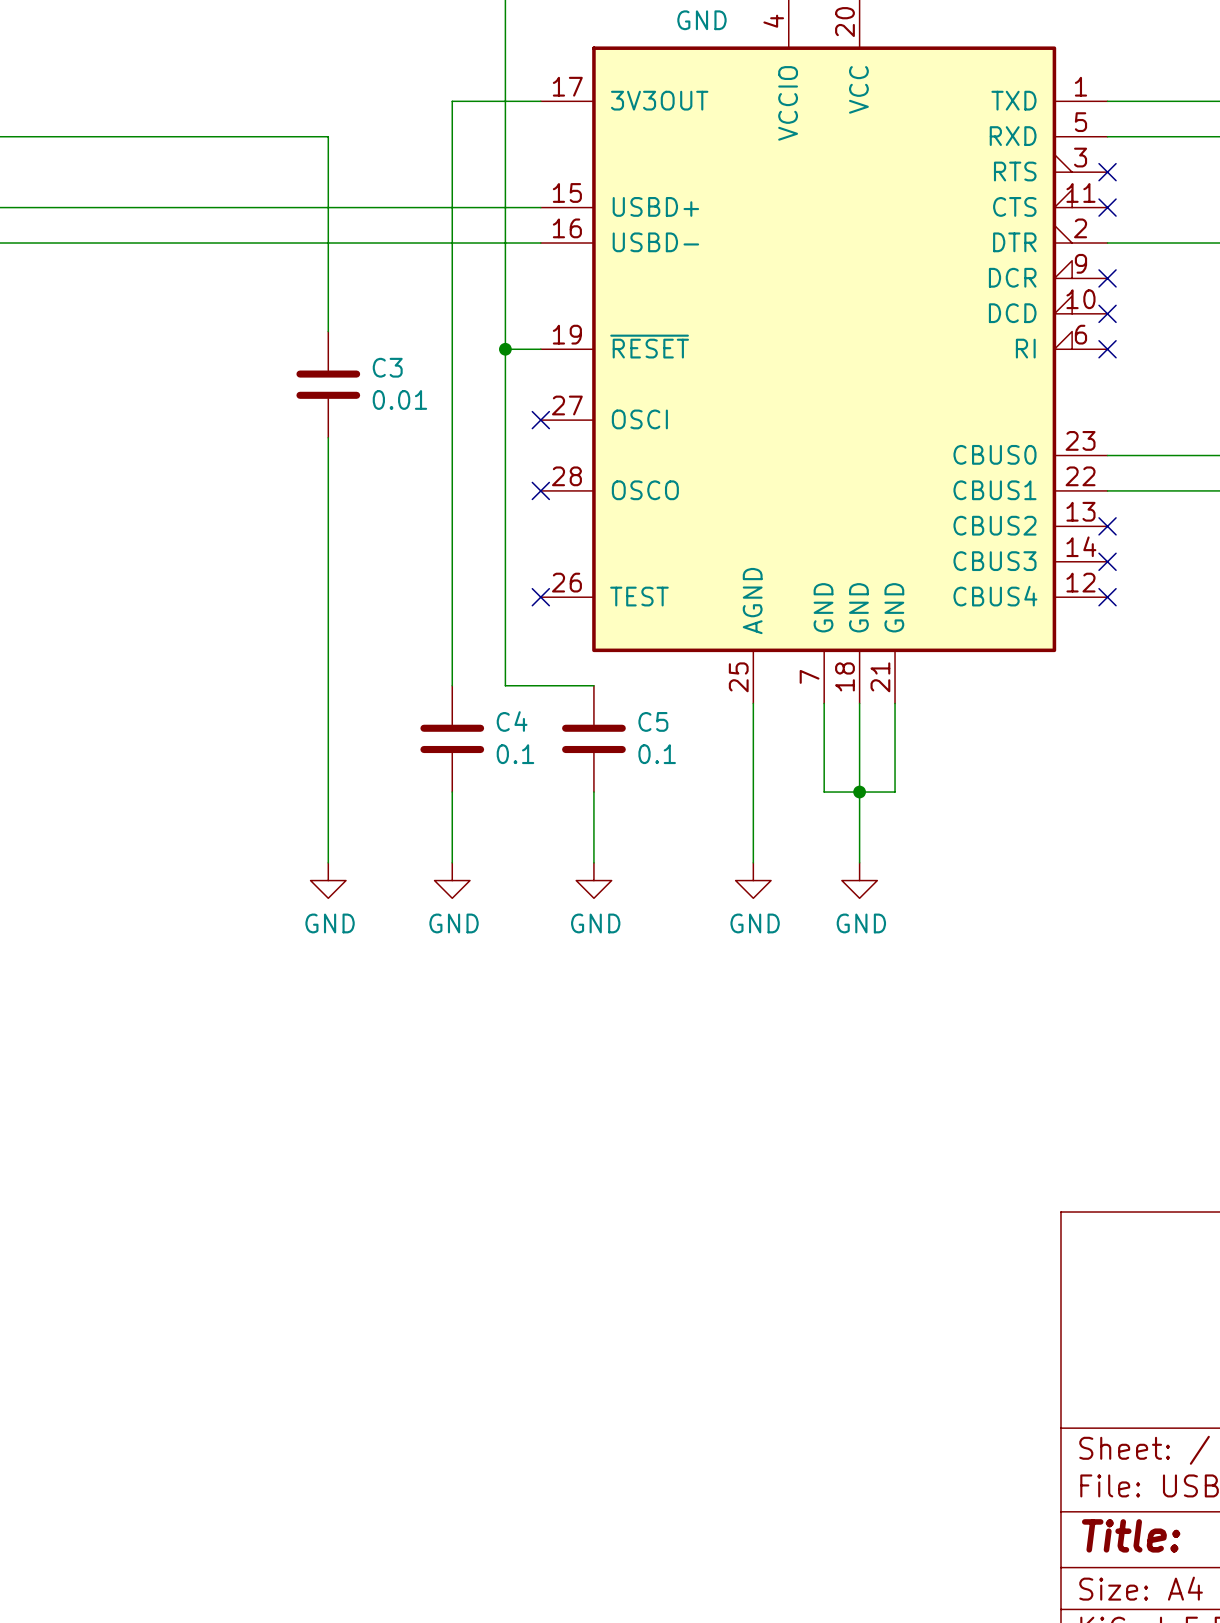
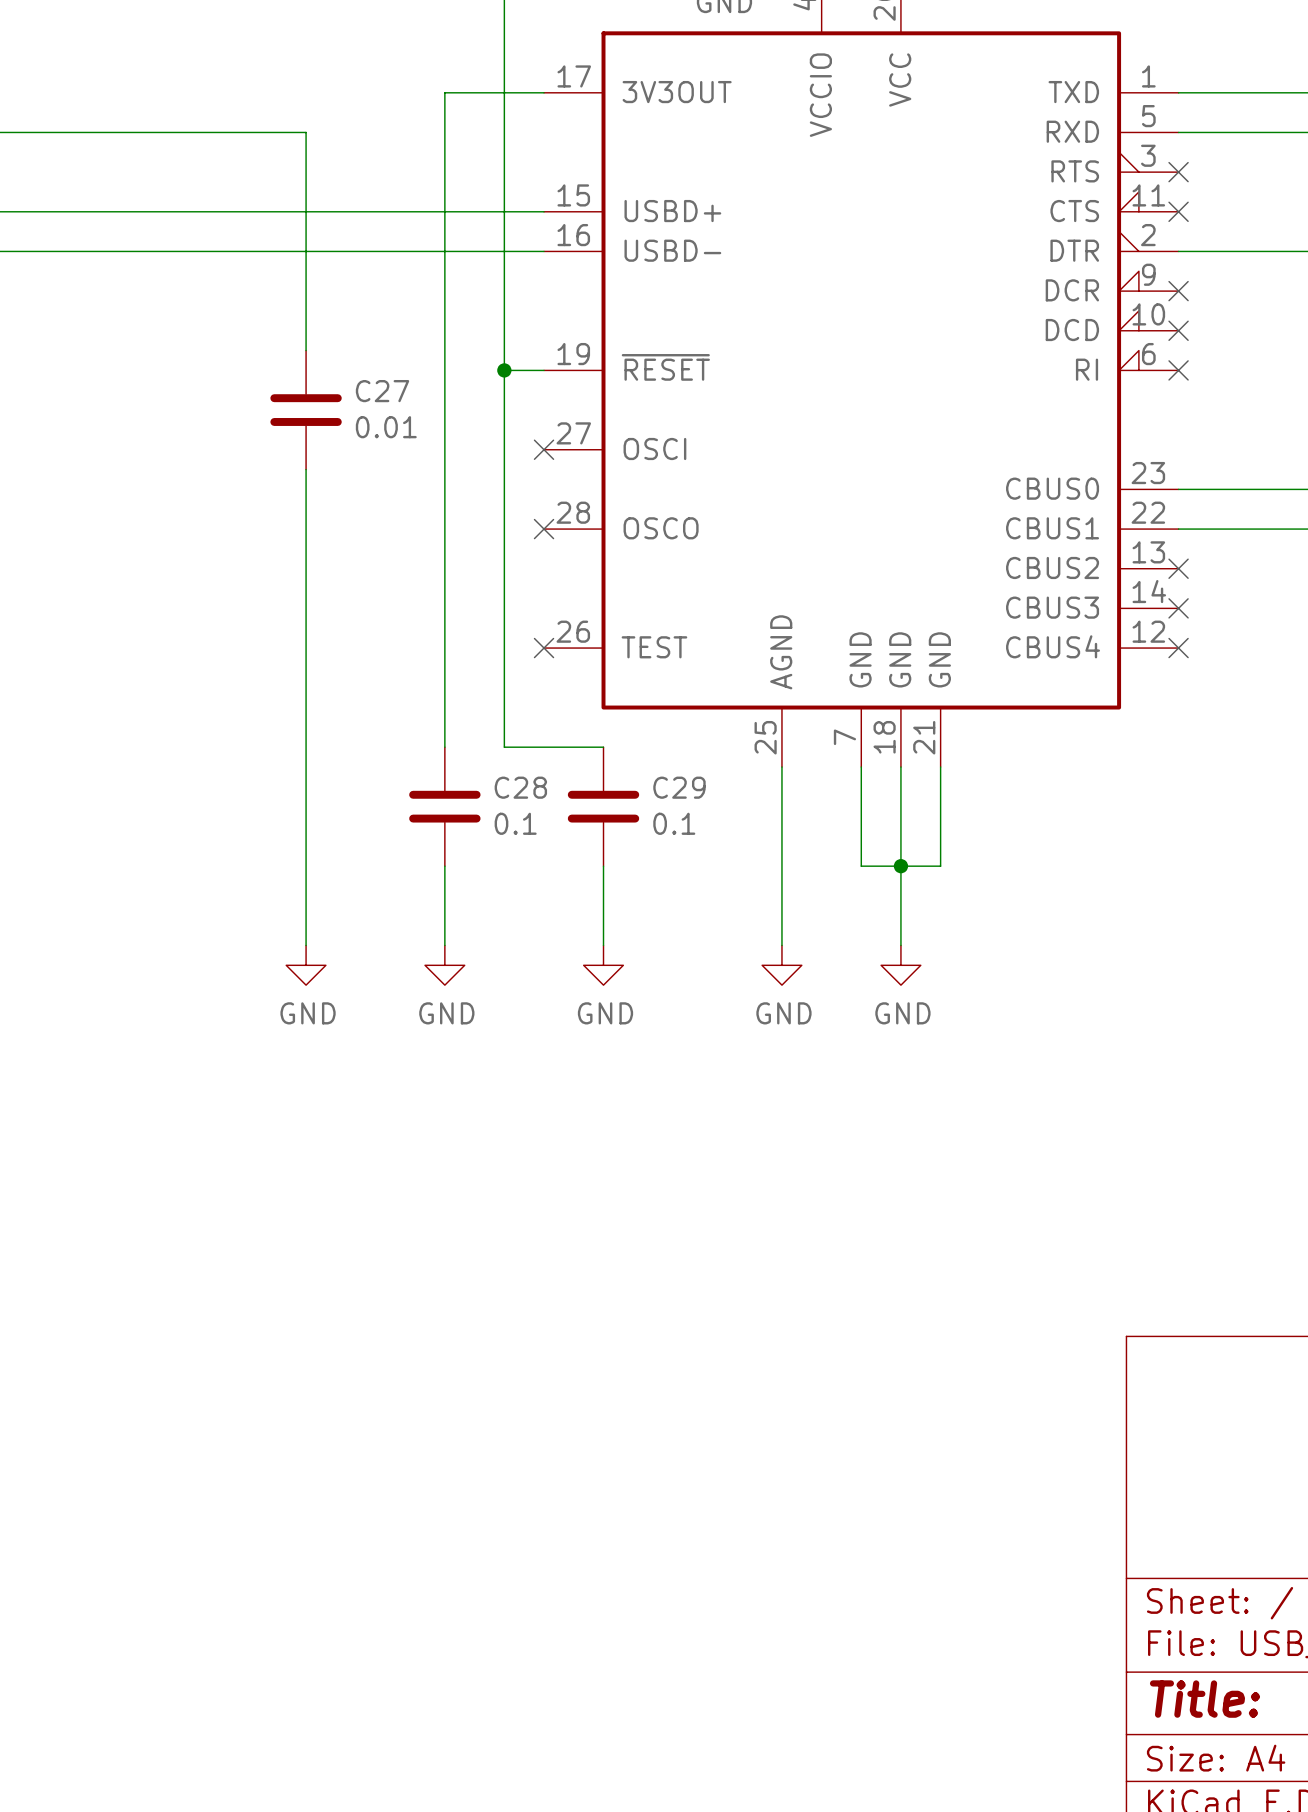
C3 name: C3 (387, 367) -> C27 (382, 391)
C4 name: C4 (512, 721) -> C28 (520, 787)
C5 name: C5 (653, 721) -> C29 (679, 787)

